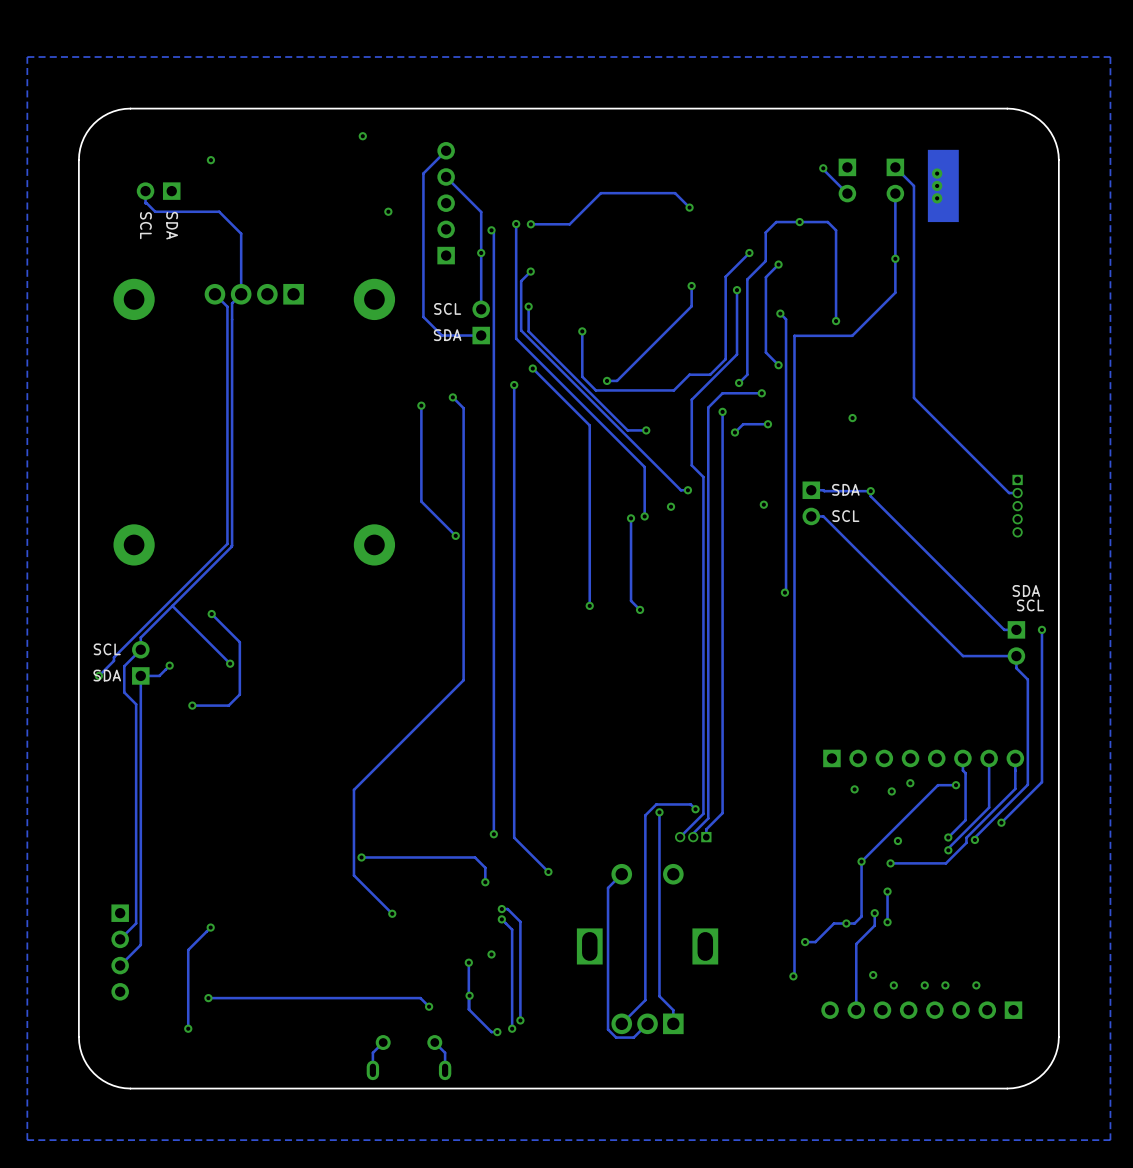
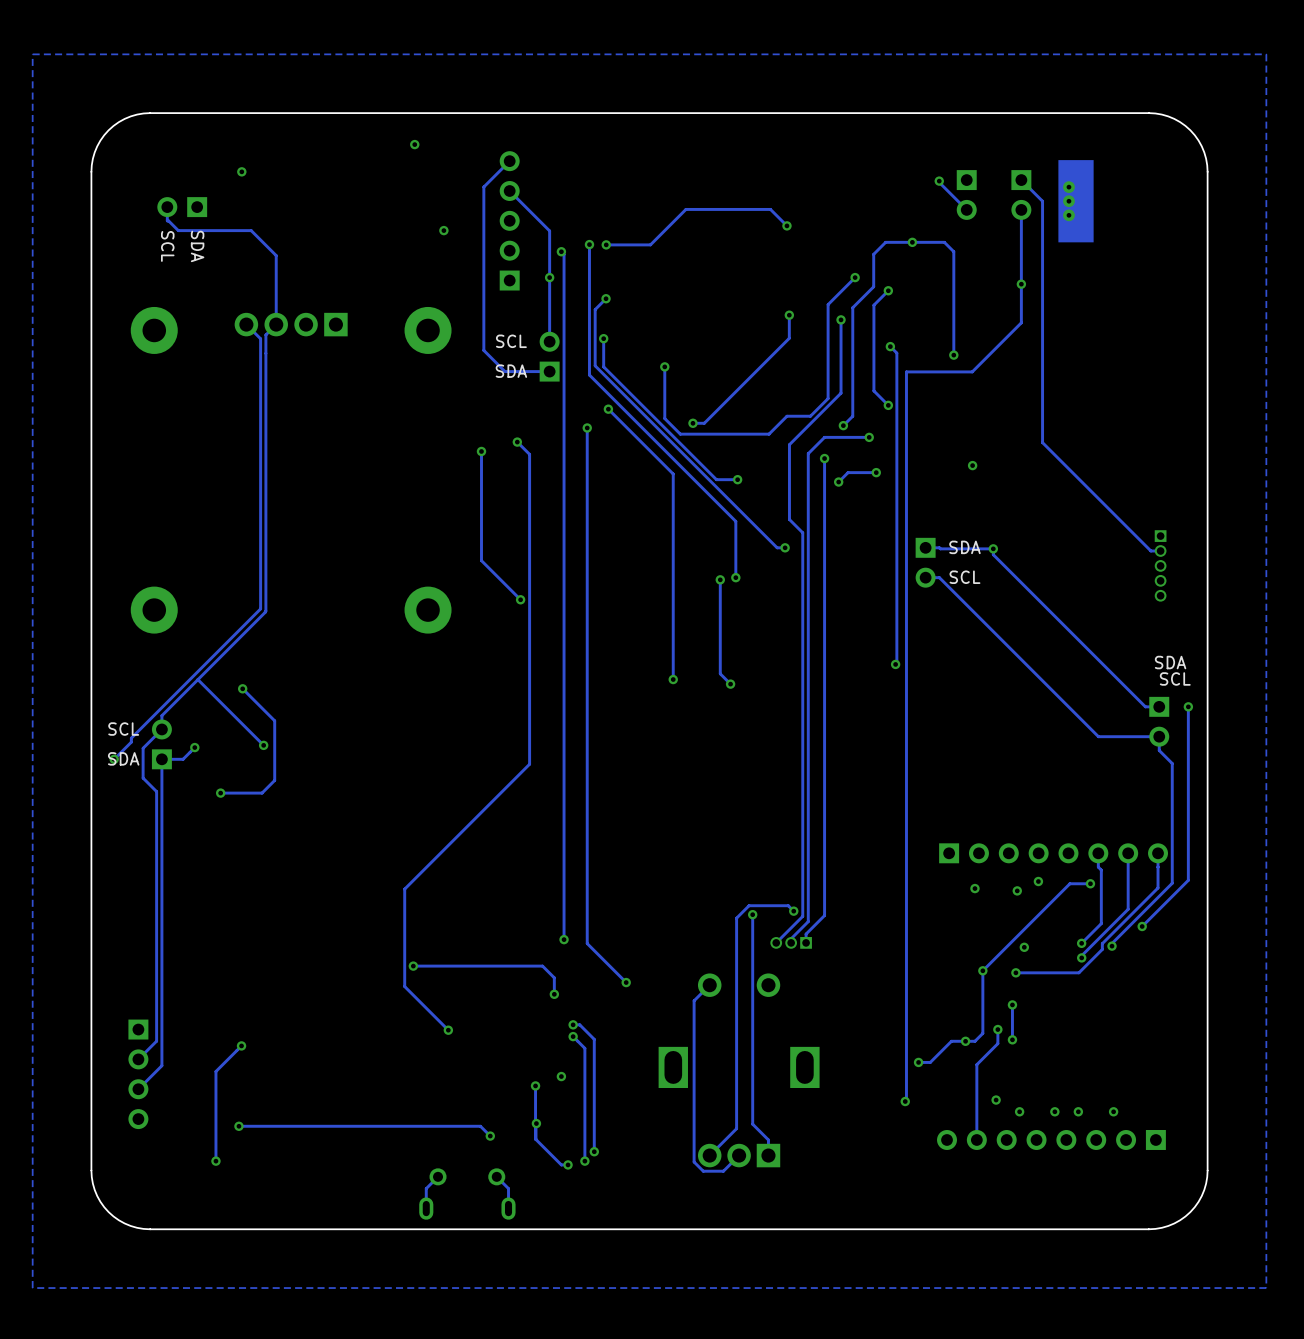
via: (763, 504) -> none
via: (671, 506) -> none

